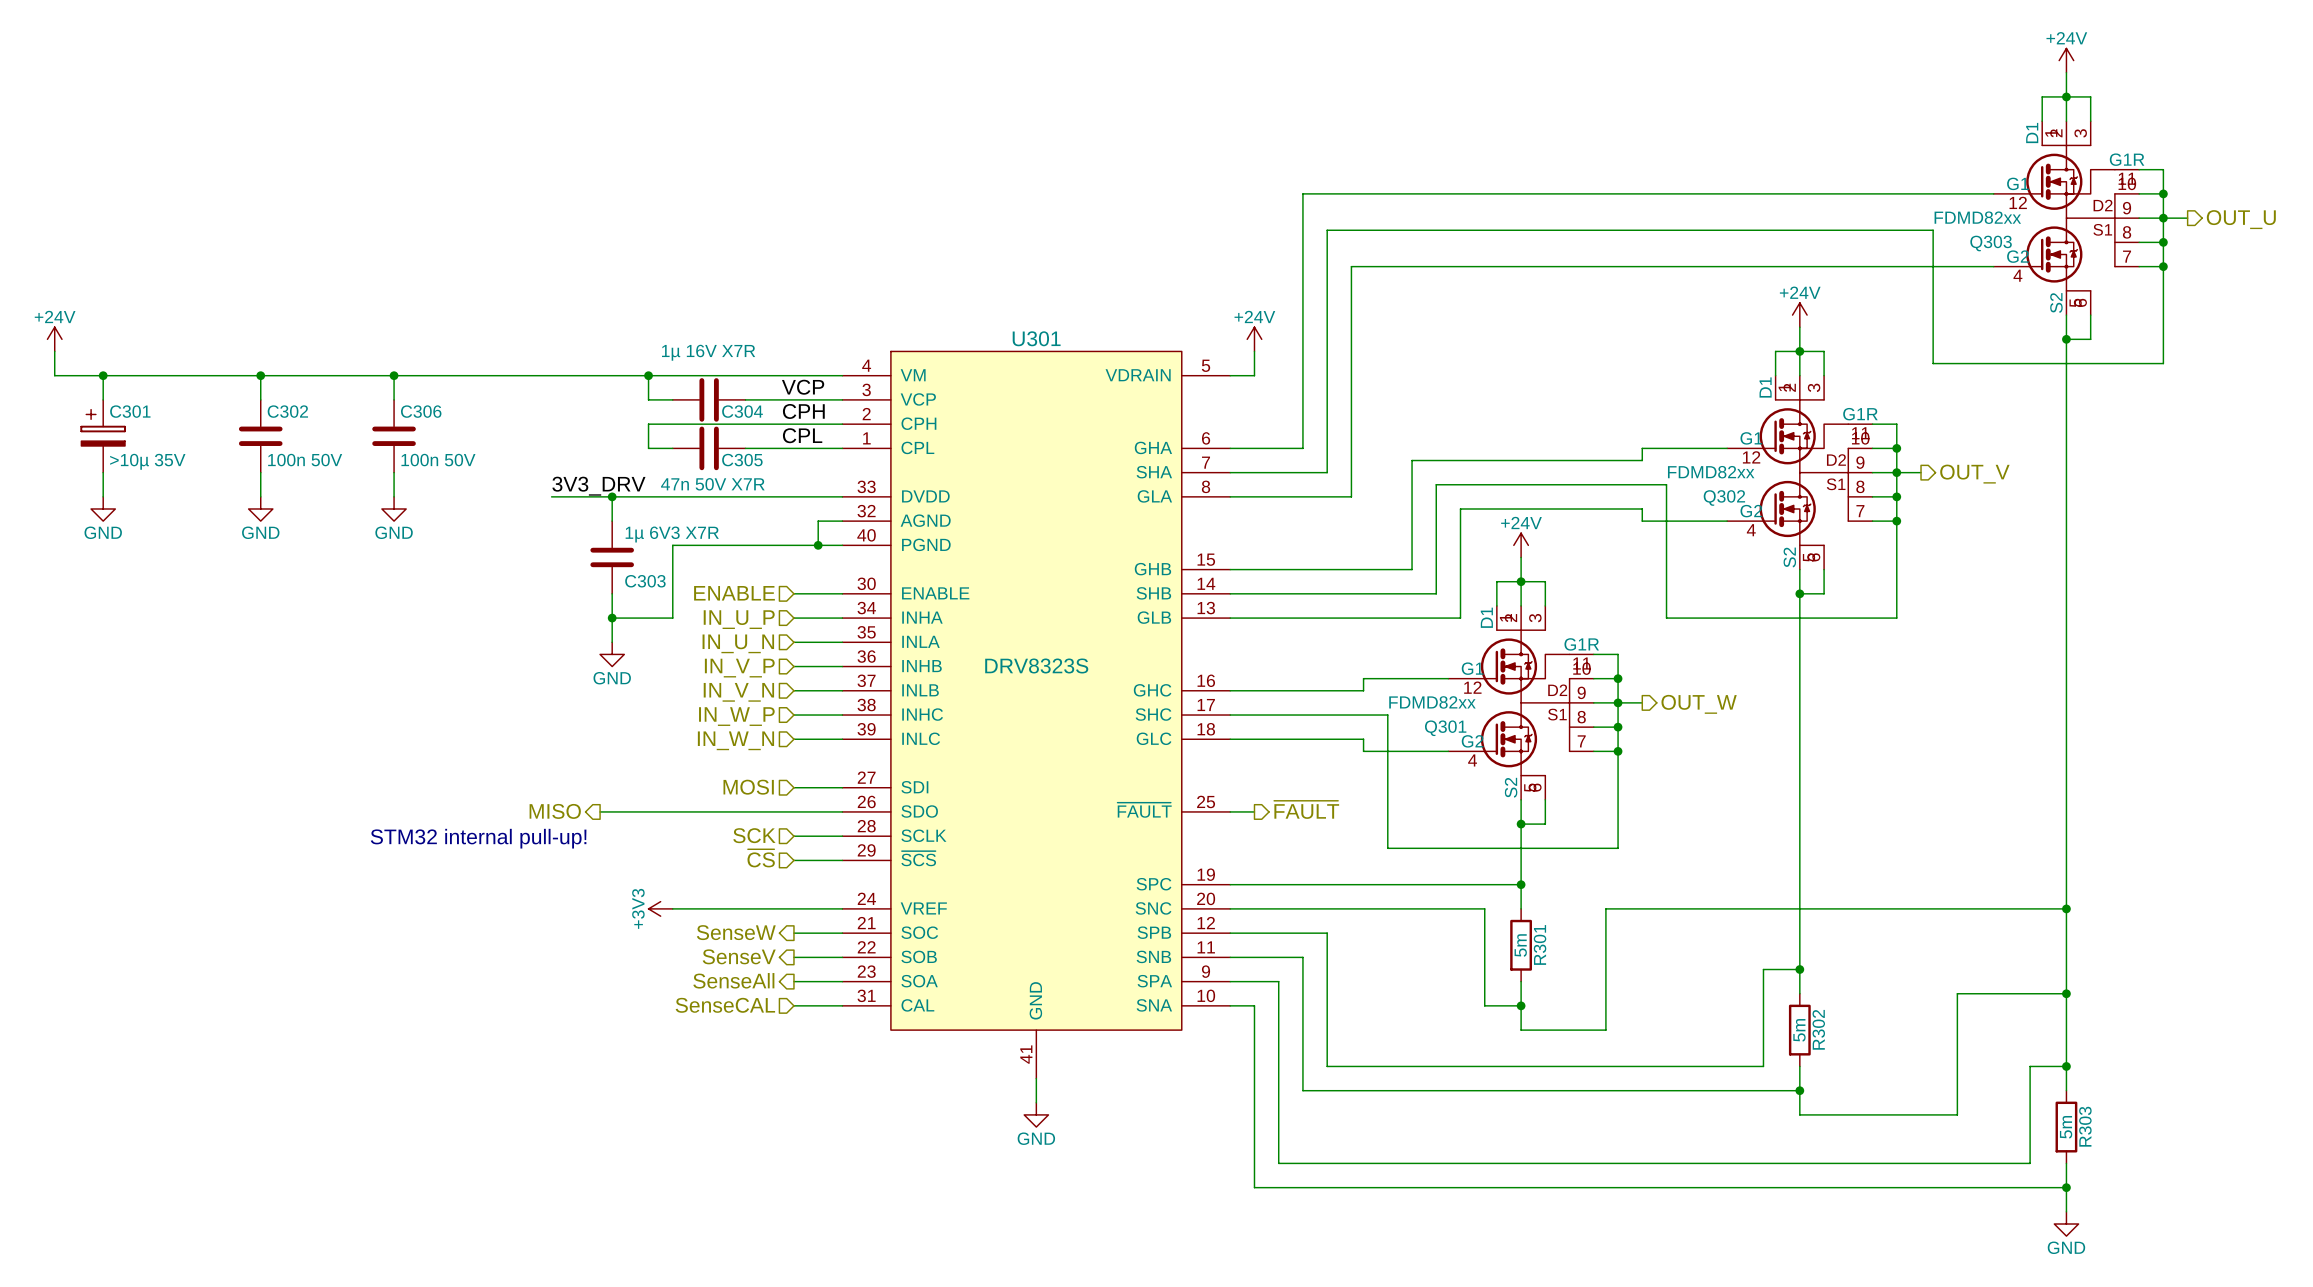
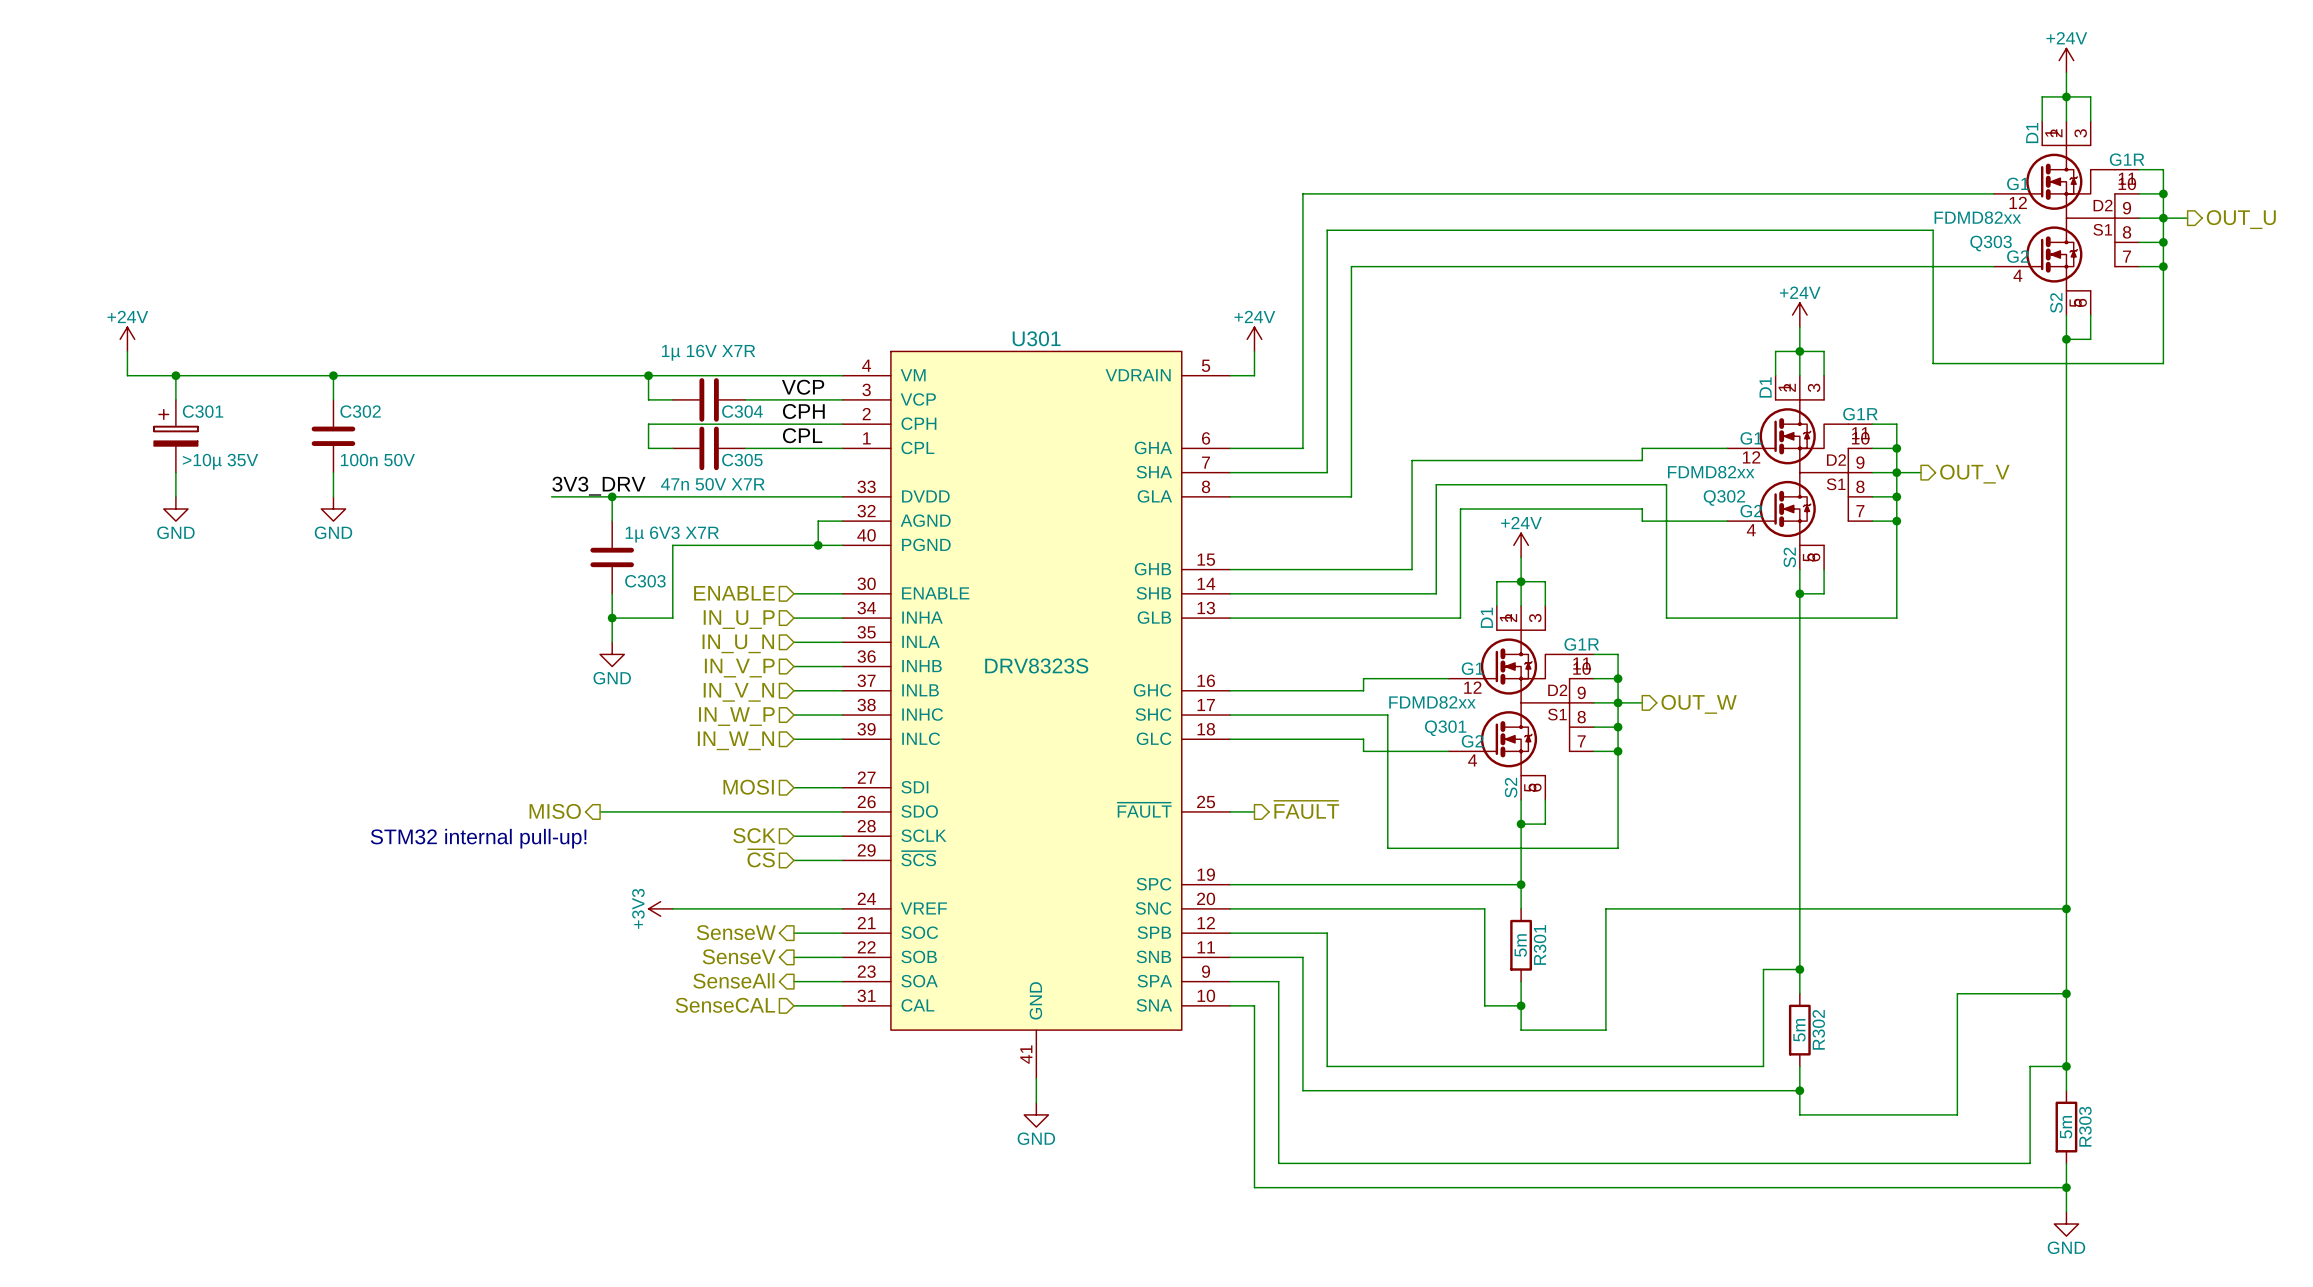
power symbol position: +24V (54, 339) -> +24V (127, 339)
wire: (54, 351) (54, 375) (127, 375) -> (127, 351) (127, 375)
wire: (103, 375) (103, 399) -> (175, 375) (175, 399)
junction: (103, 375) -> none
junction: none -> (175, 375)
wire: (260, 375) (260, 399) -> (333, 375) (333, 399)
junction: (260, 375) -> none
junction: none -> (333, 375)
wire: (394, 375) (394, 399) -> none
junction: (394, 375) -> none
C301 position: (103, 436) -> (175, 436)
C302 position: (260, 436) -> (333, 436)
C306: 100n 50V (394, 436) -> none
wire: (103, 472) (103, 496) -> (175, 472) (175, 496)
wire: (260, 472) (260, 496) -> (333, 472) (333, 496)
wire: (394, 472) (394, 496) -> none
power symbol: GND (103, 508) -> none
power symbol: none -> GND (175, 508)
power symbol: GND (260, 508) -> none
power symbol: none -> GND (333, 508)
power symbol: GND (394, 508) -> none

